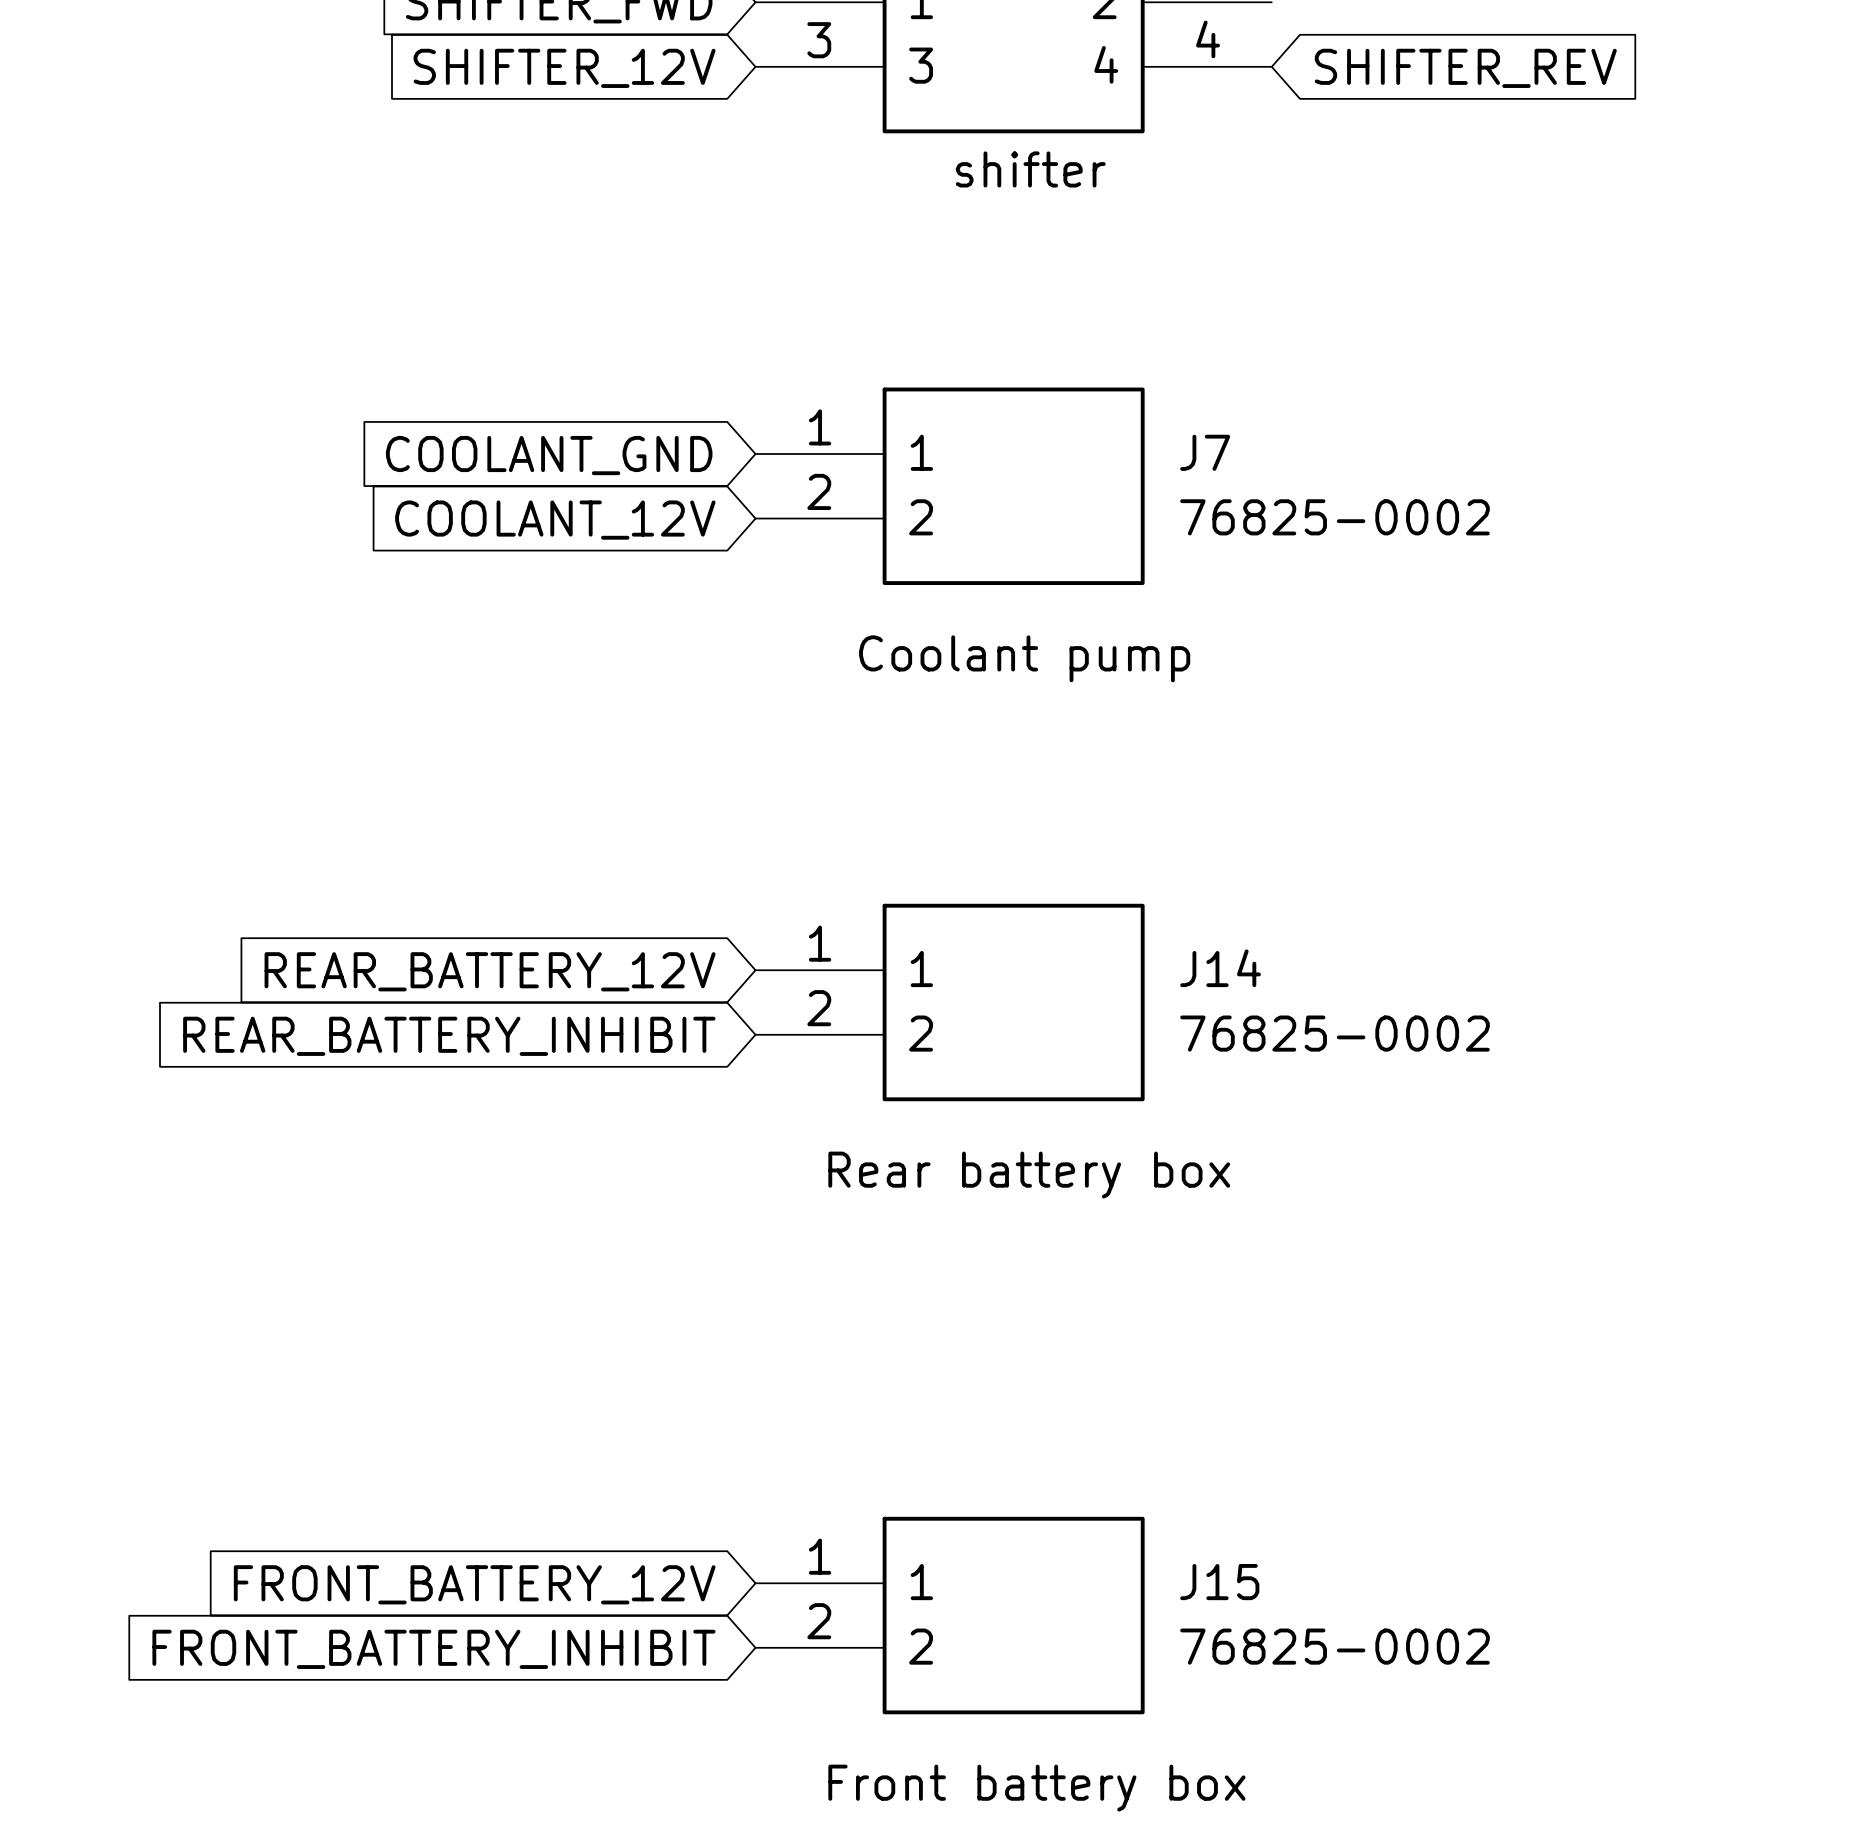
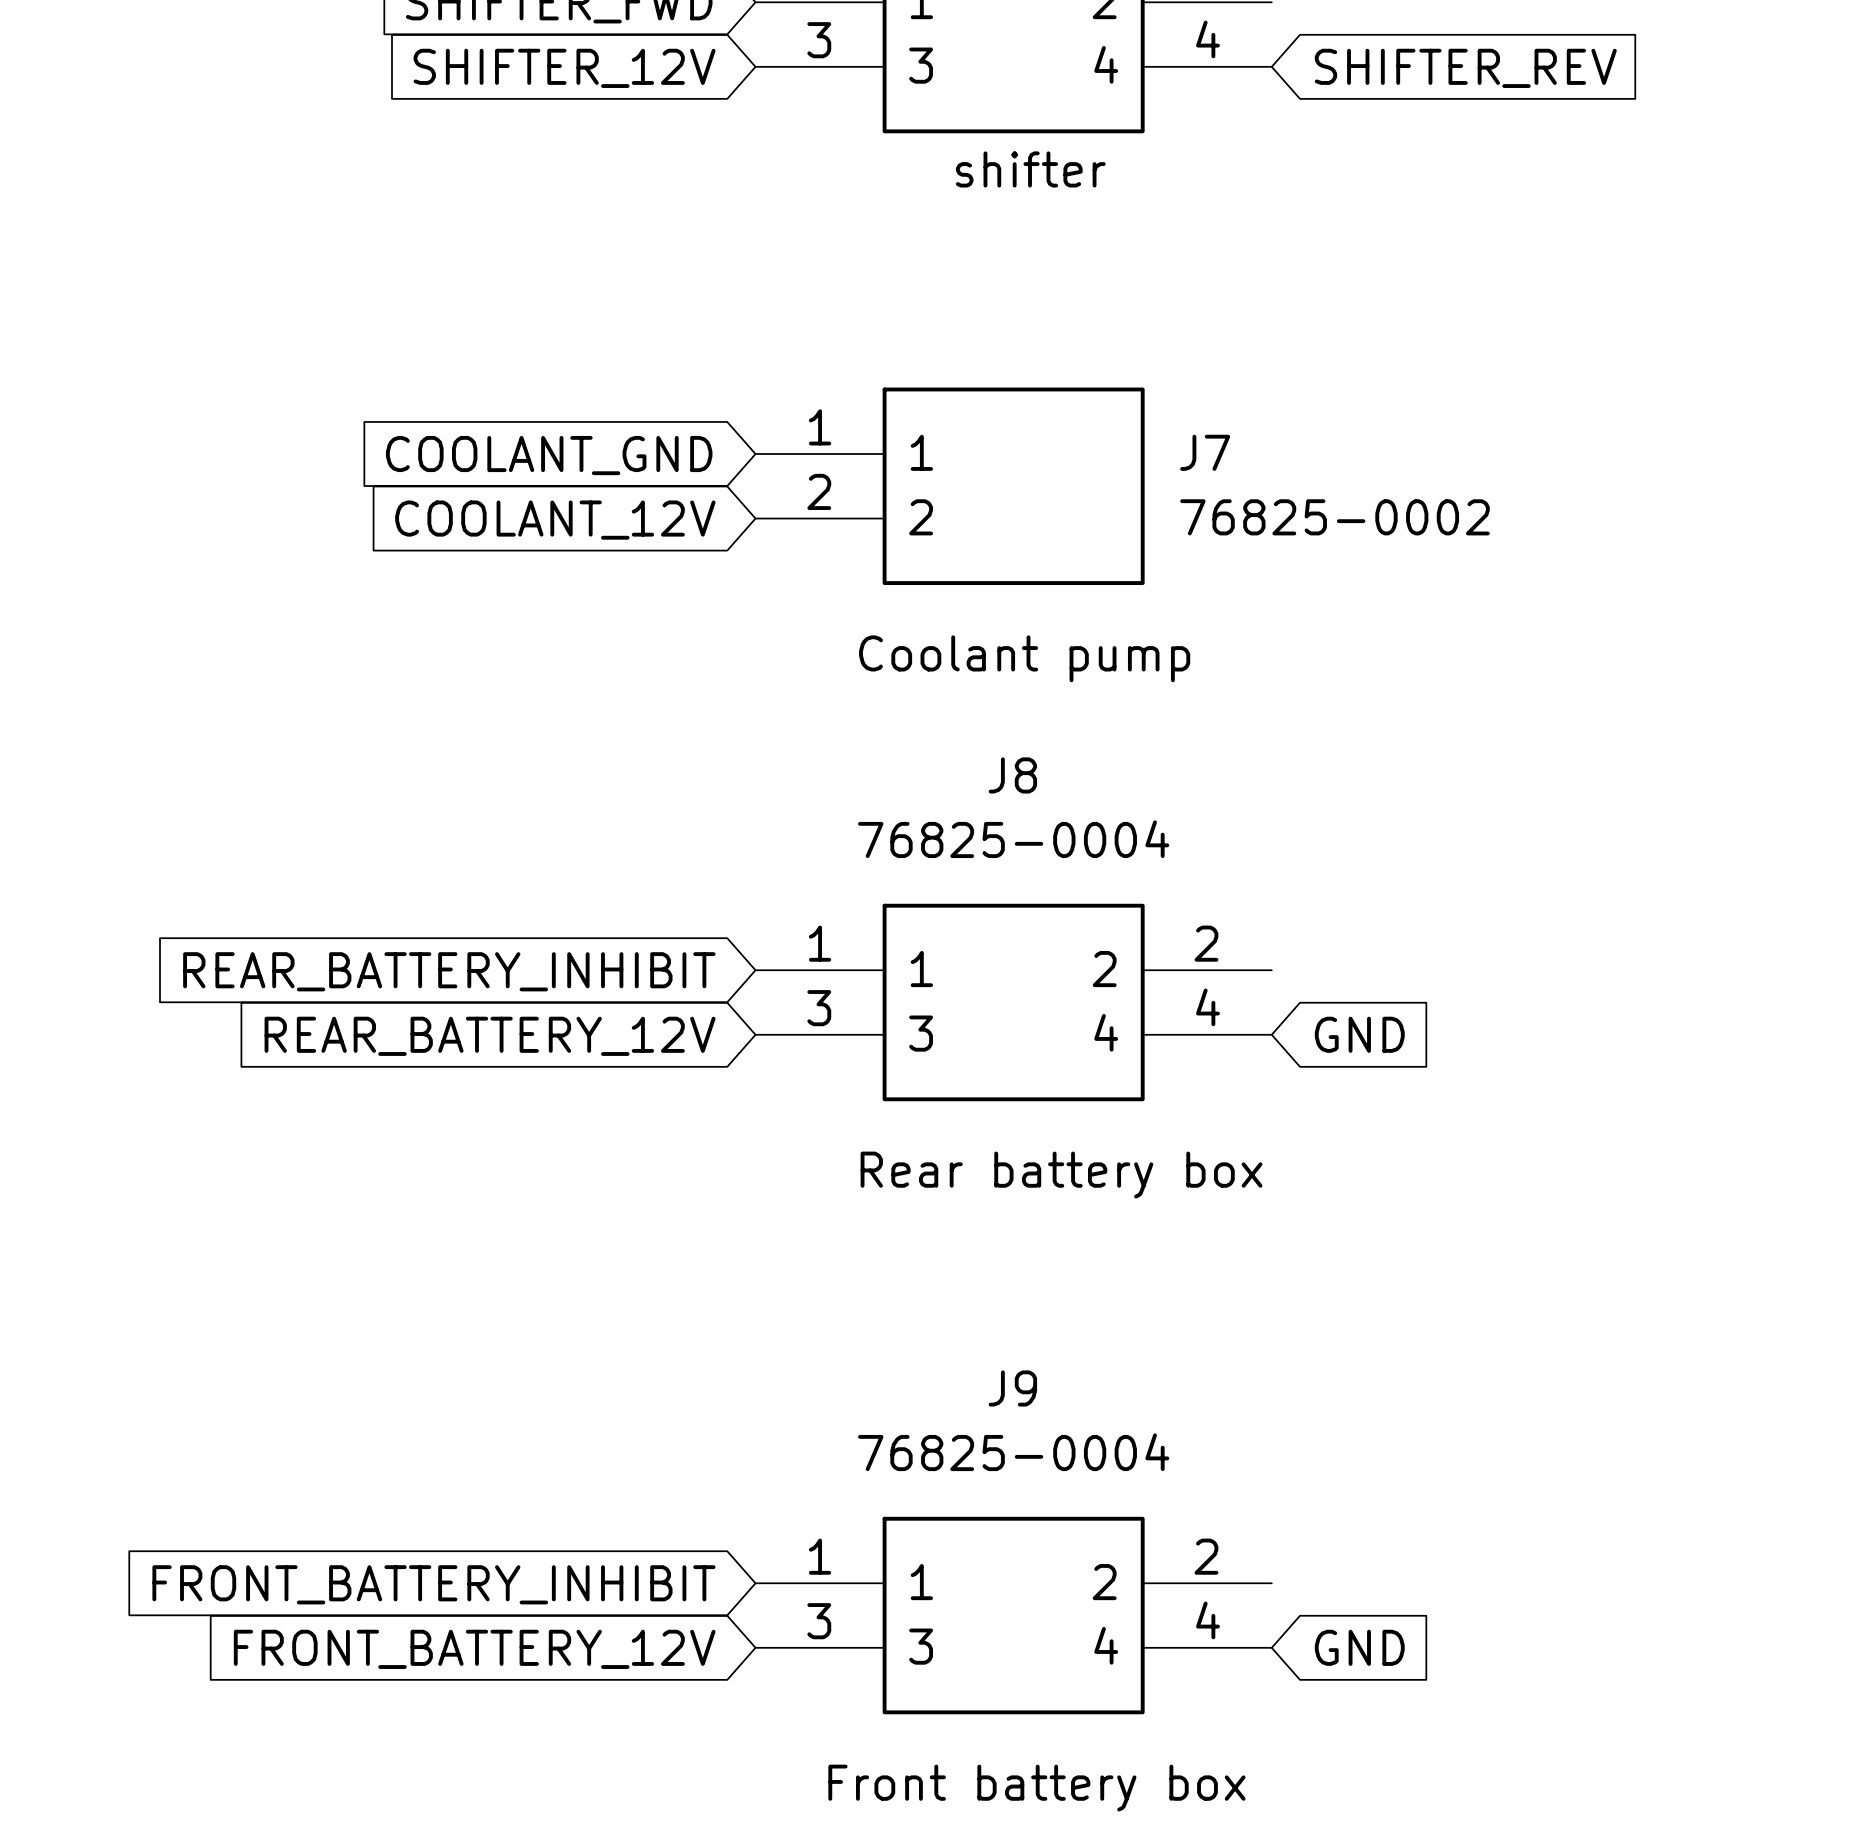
global label: REAR_BATTERY_12V (490, 971) -> REAR_BATTERY_INHIBIT (449, 971)
J14: 76825-0002 (950, 1002) -> none
J8: none -> 76825-0004 (1013, 1002)
global label: none -> GND (1359, 1034)
global label: REAR_BATTERY_INHIBIT (449, 1036) -> REAR_BATTERY_12V (490, 1036)
text position: Rear battery box (1029, 1175) -> Rear battery box (1061, 1175)
global label: FRONT_BATTERY_12V (474, 1584) -> FRONT_BATTERY_INHIBIT (433, 1584)
J15: 76825-0002 (950, 1615) -> none
J9: none -> 76825-0004 (1013, 1615)
global label: none -> GND (1359, 1647)
global label: FRONT_BATTERY_INHIBIT (433, 1649) -> FRONT_BATTERY_12V (474, 1649)

